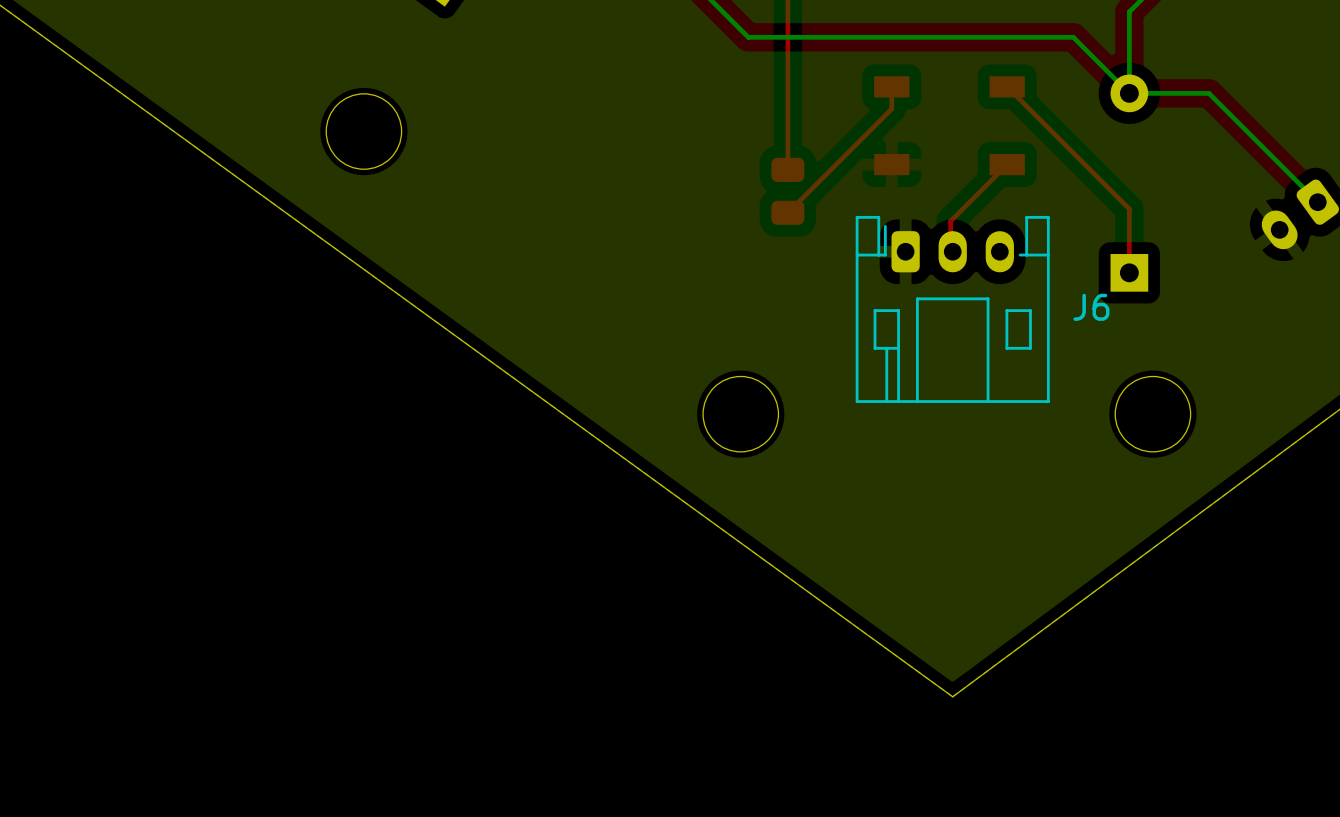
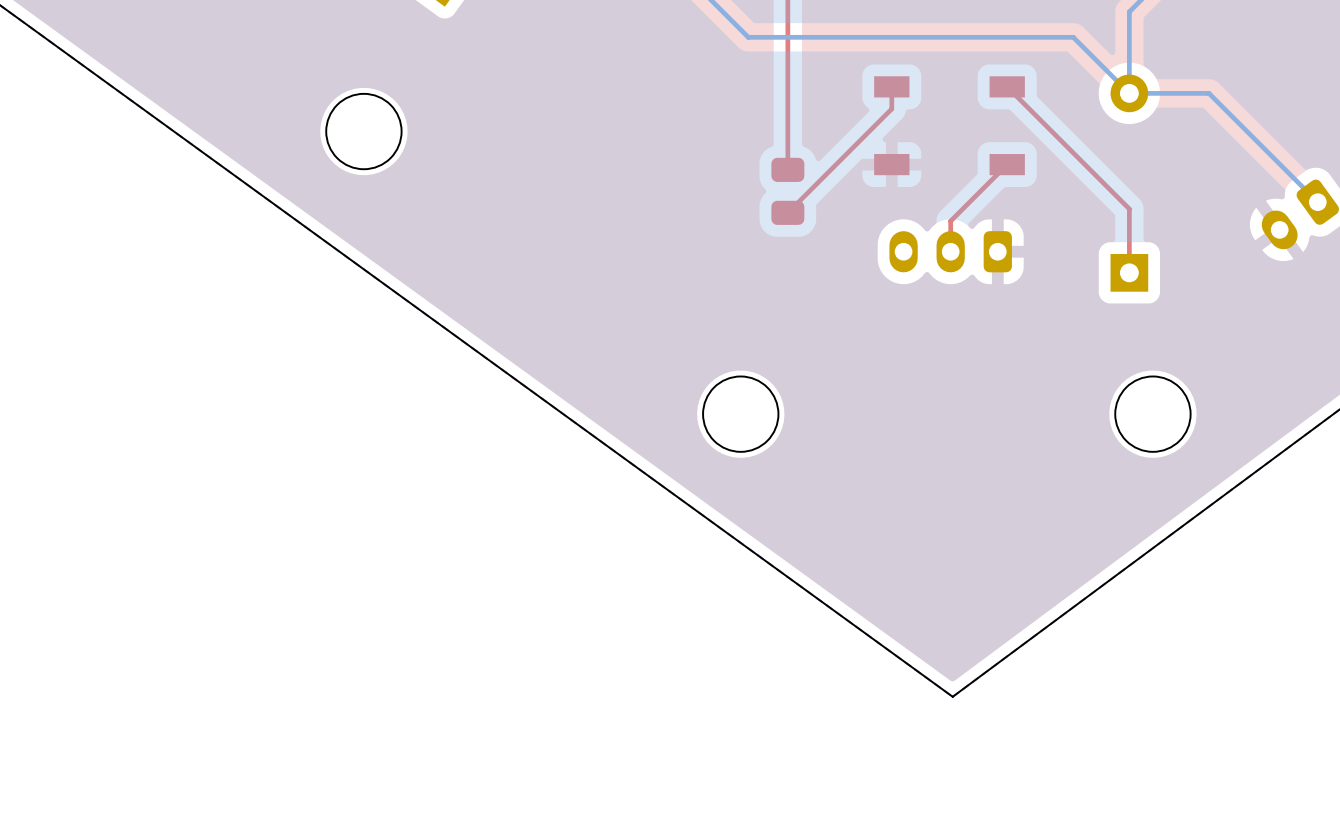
J6 side: bottom (952, 309) -> top (950, 251)

